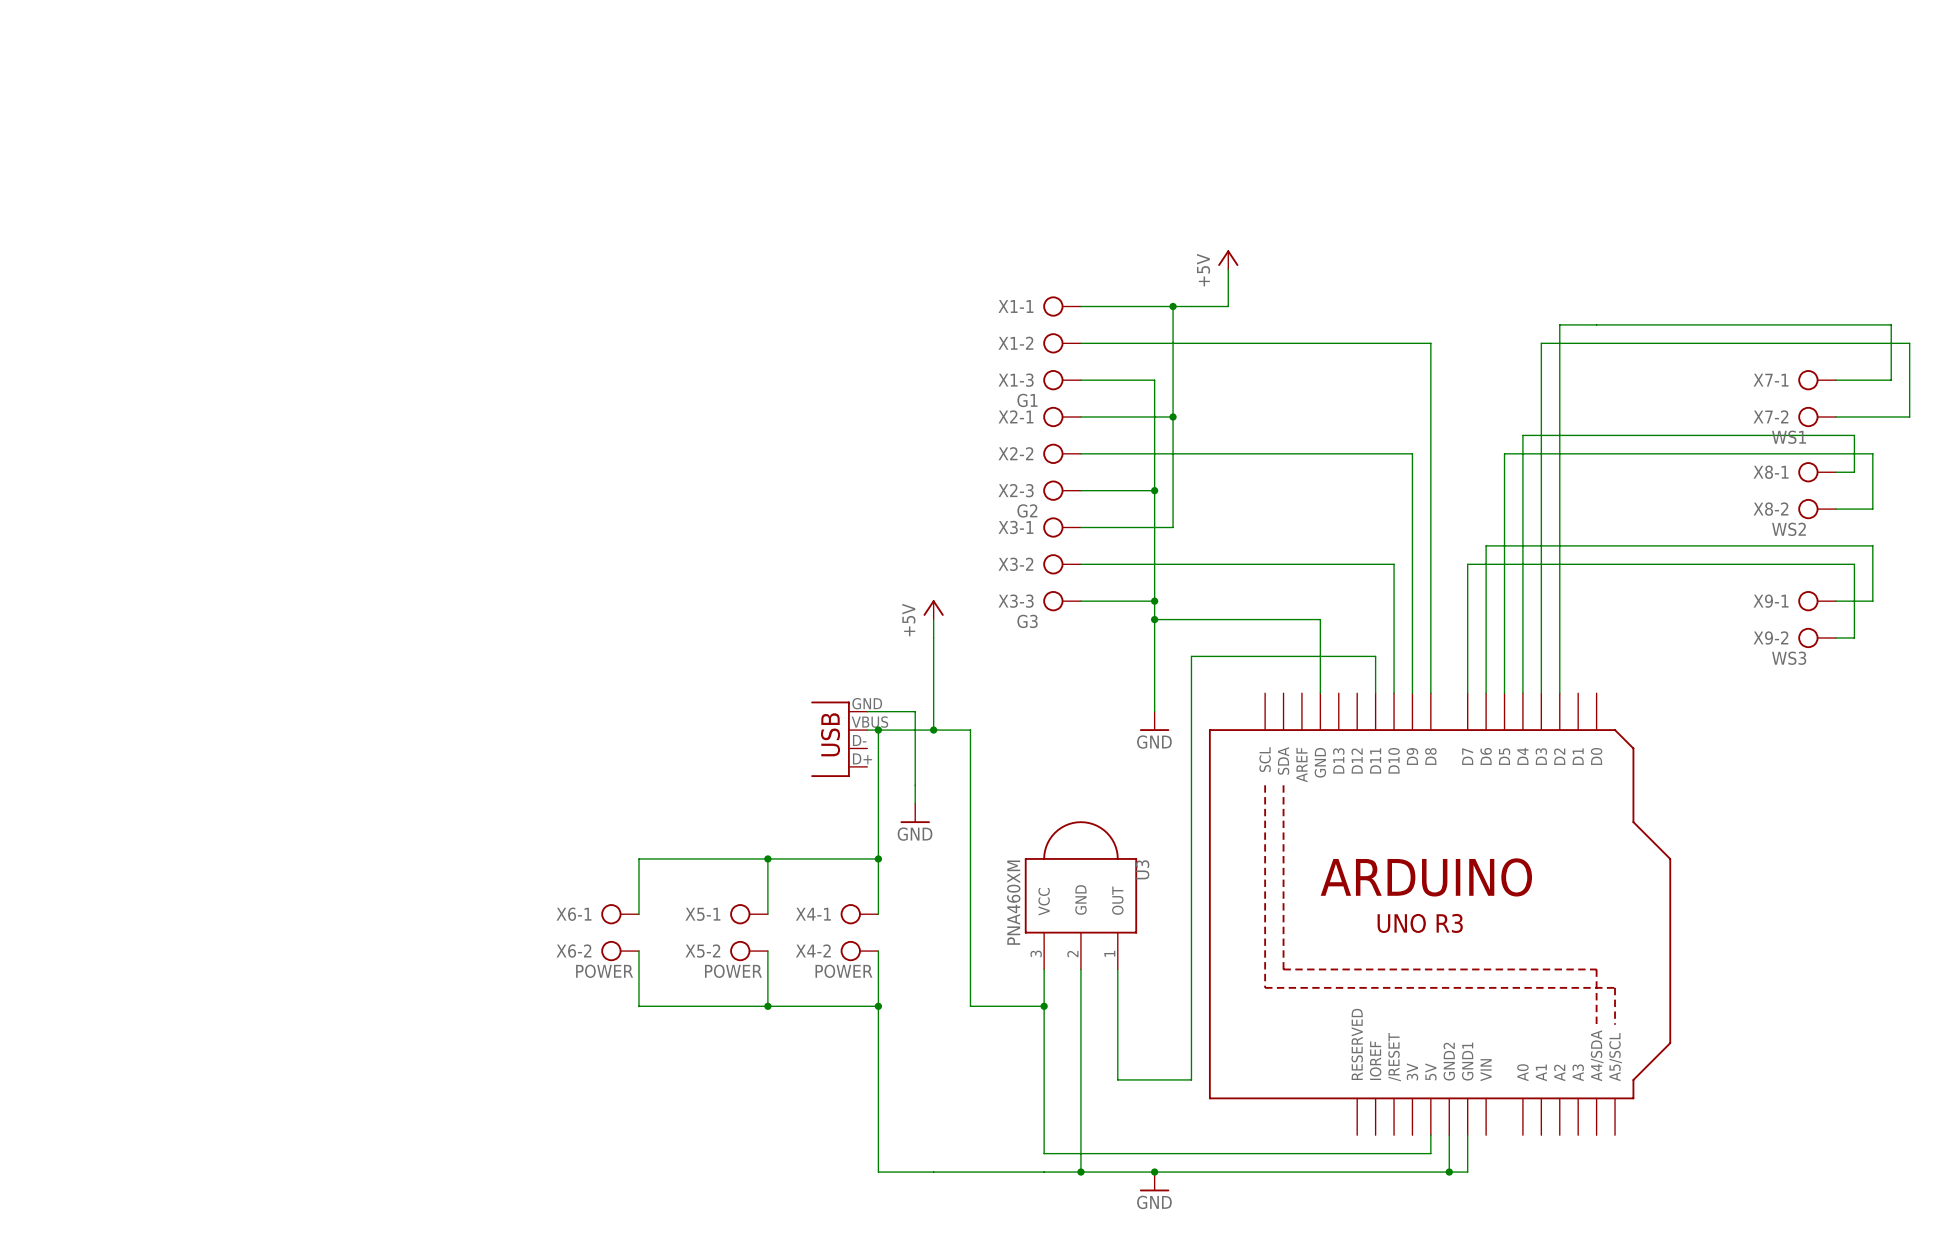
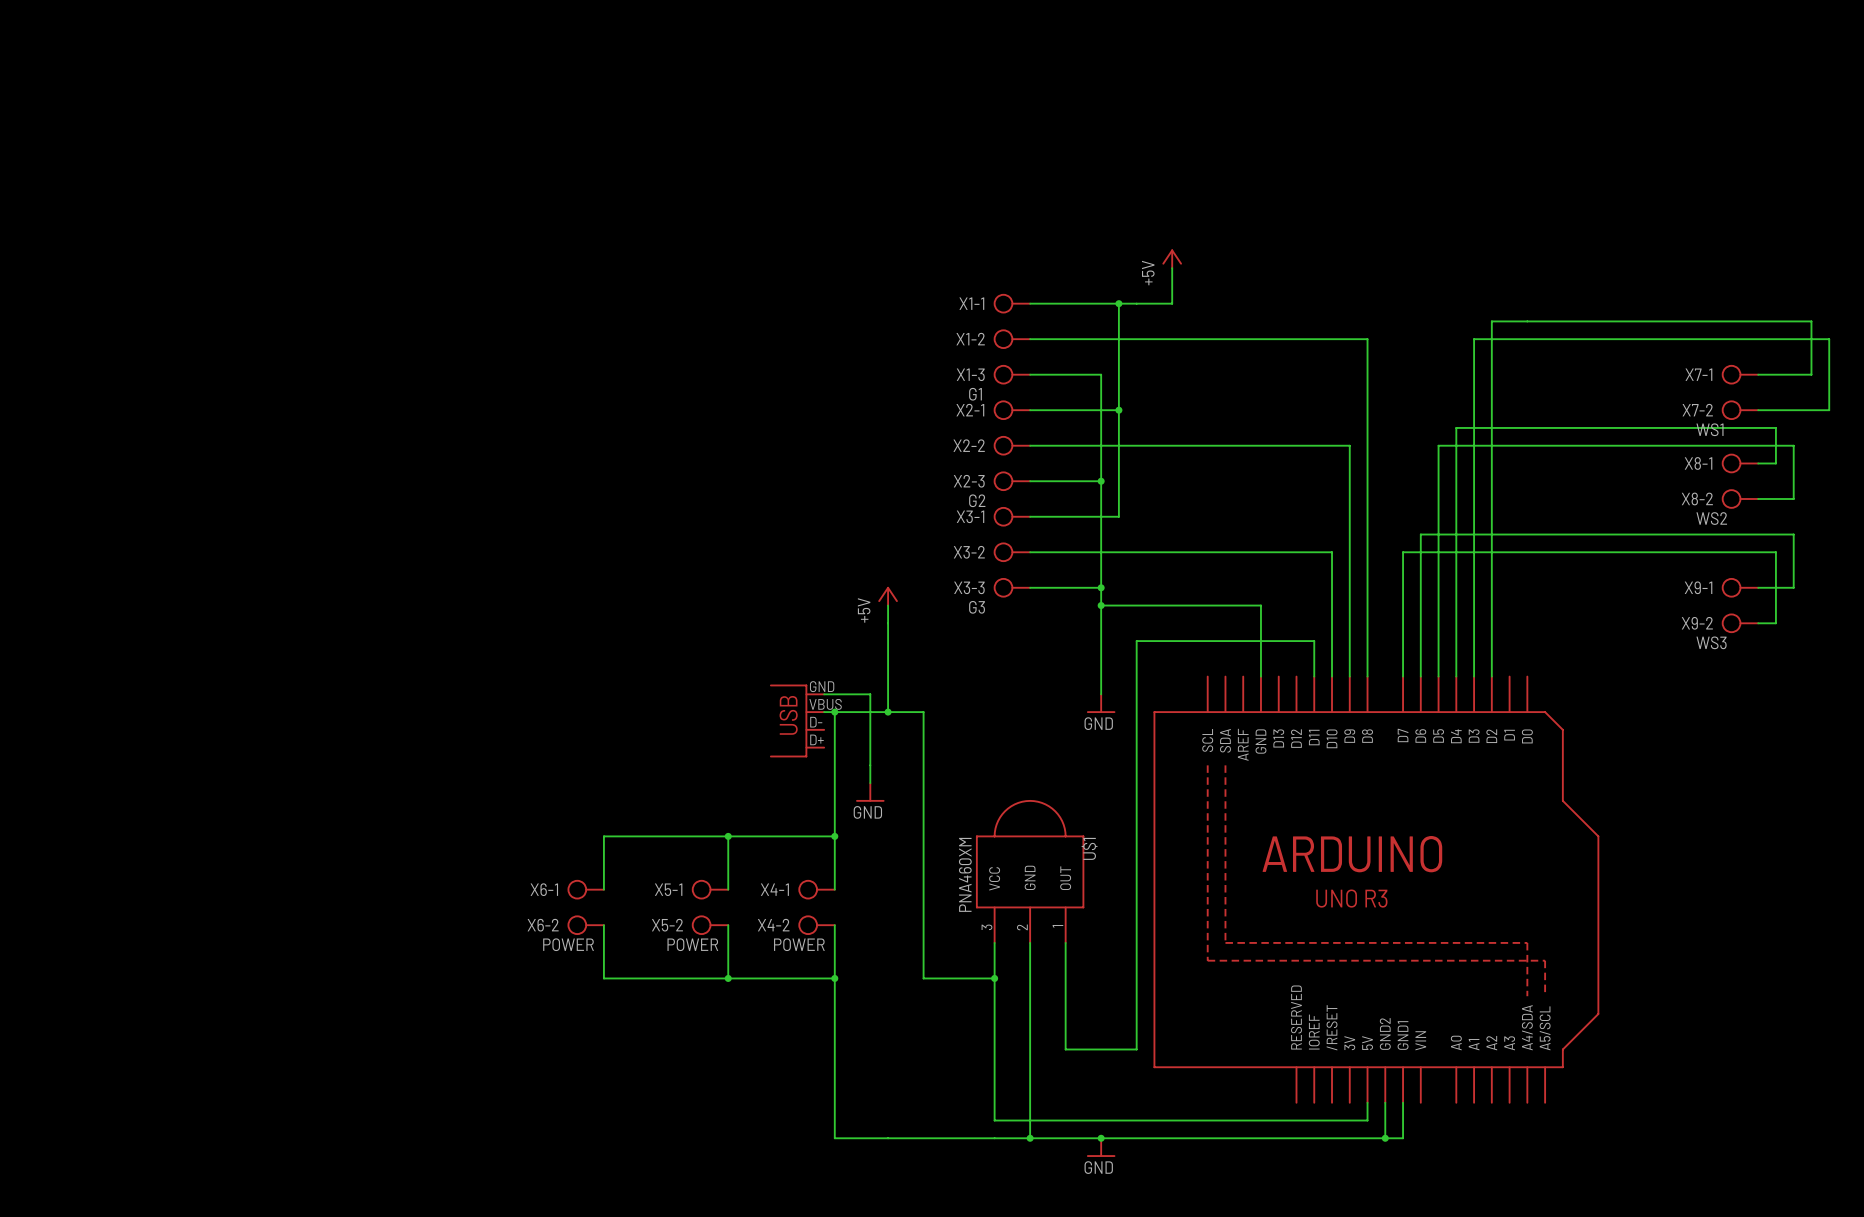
U3 name: U3 (1142, 869) -> U$1 (1089, 848)

